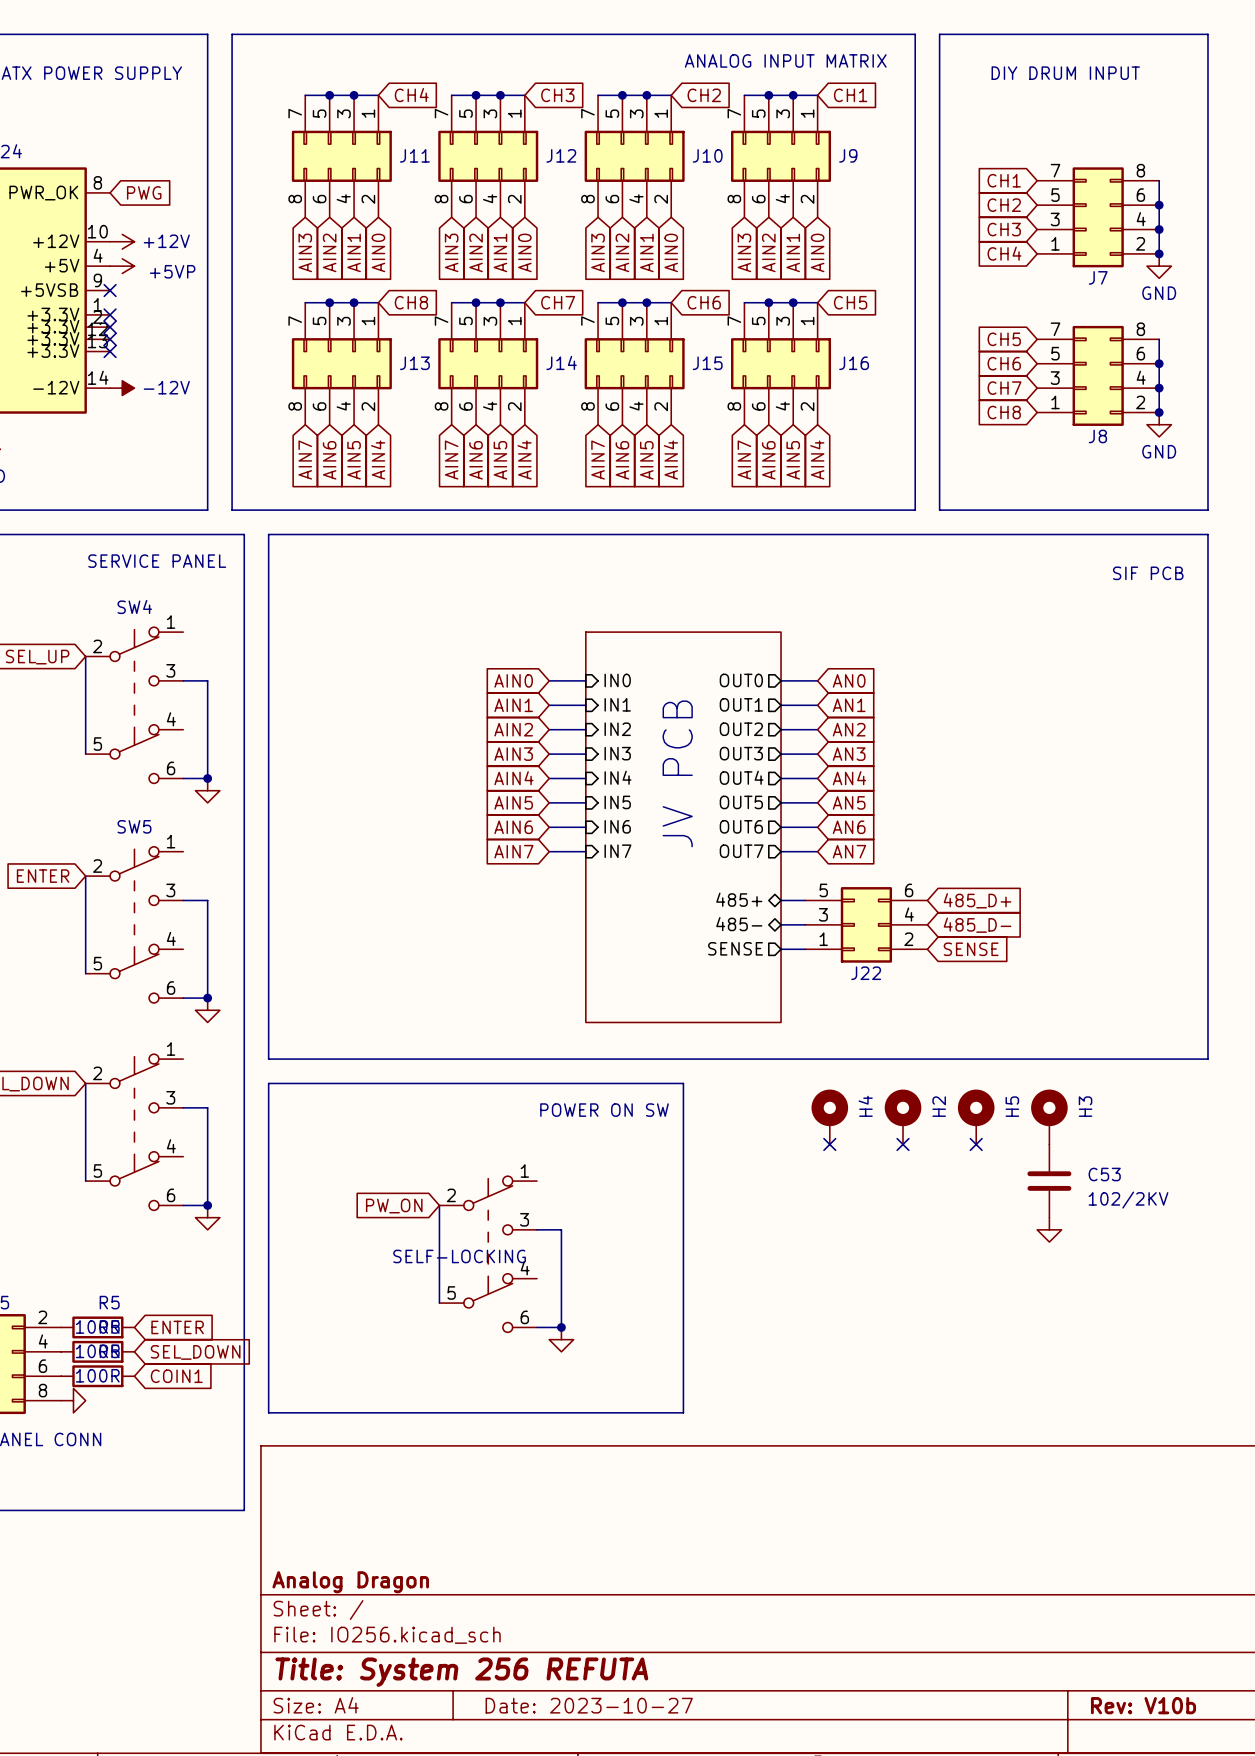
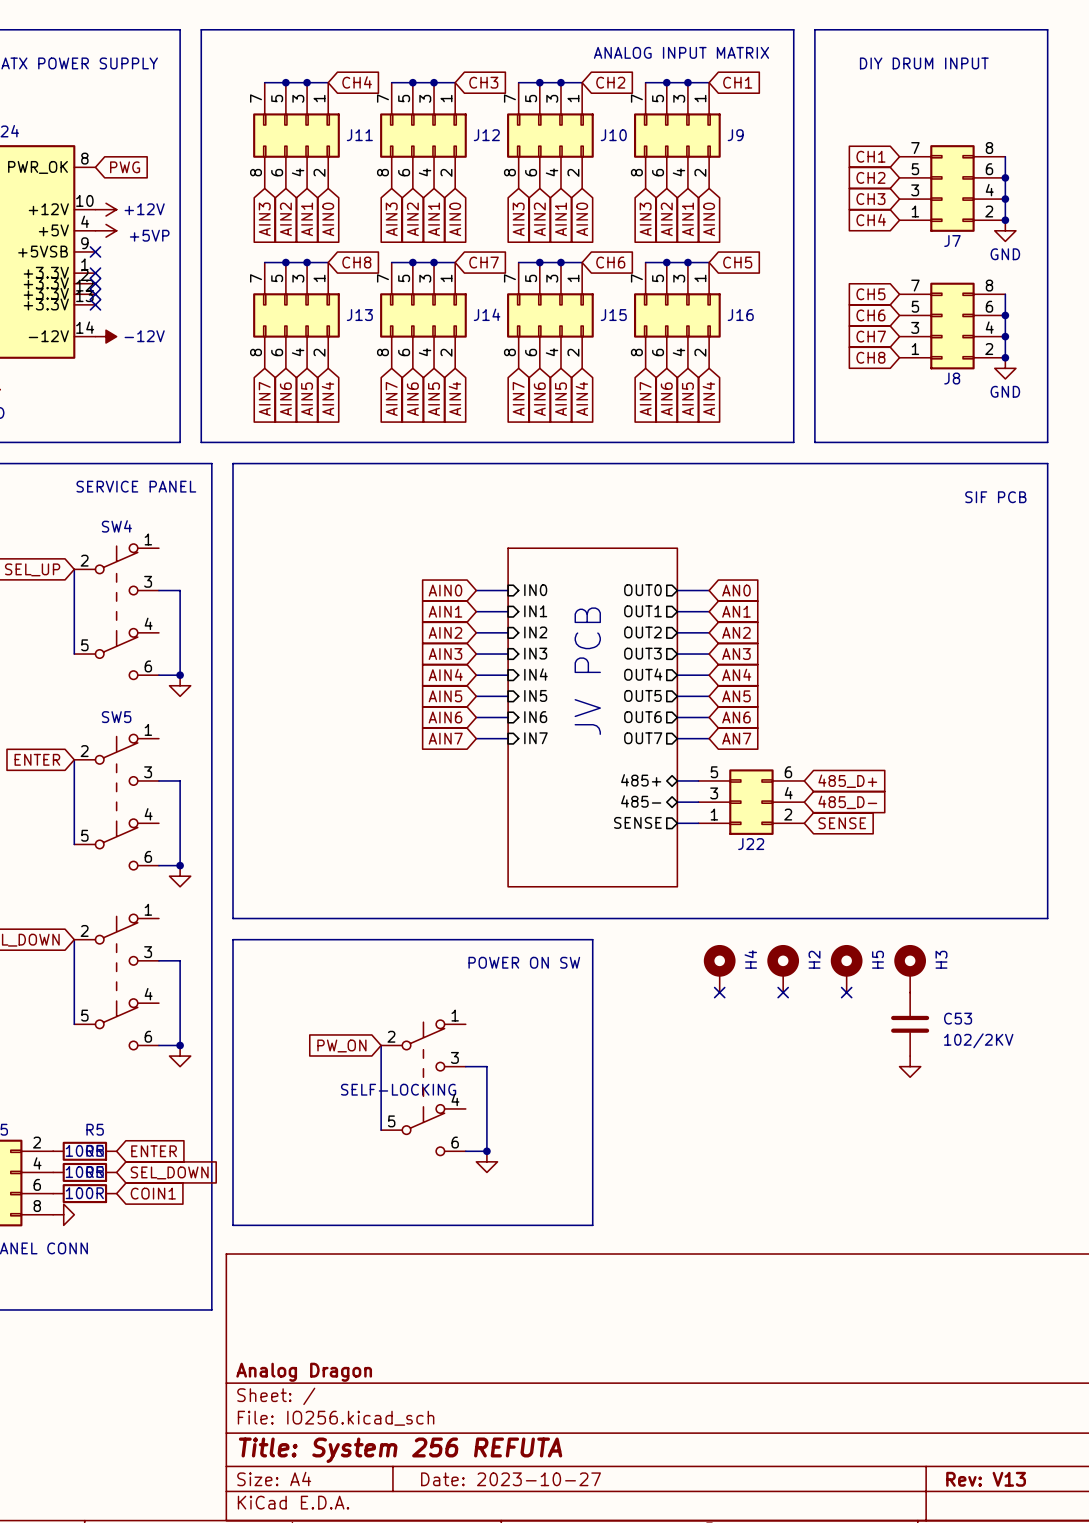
title block: Rev: V10b (1143, 1705) -> Rev: V13 (986, 1479)

